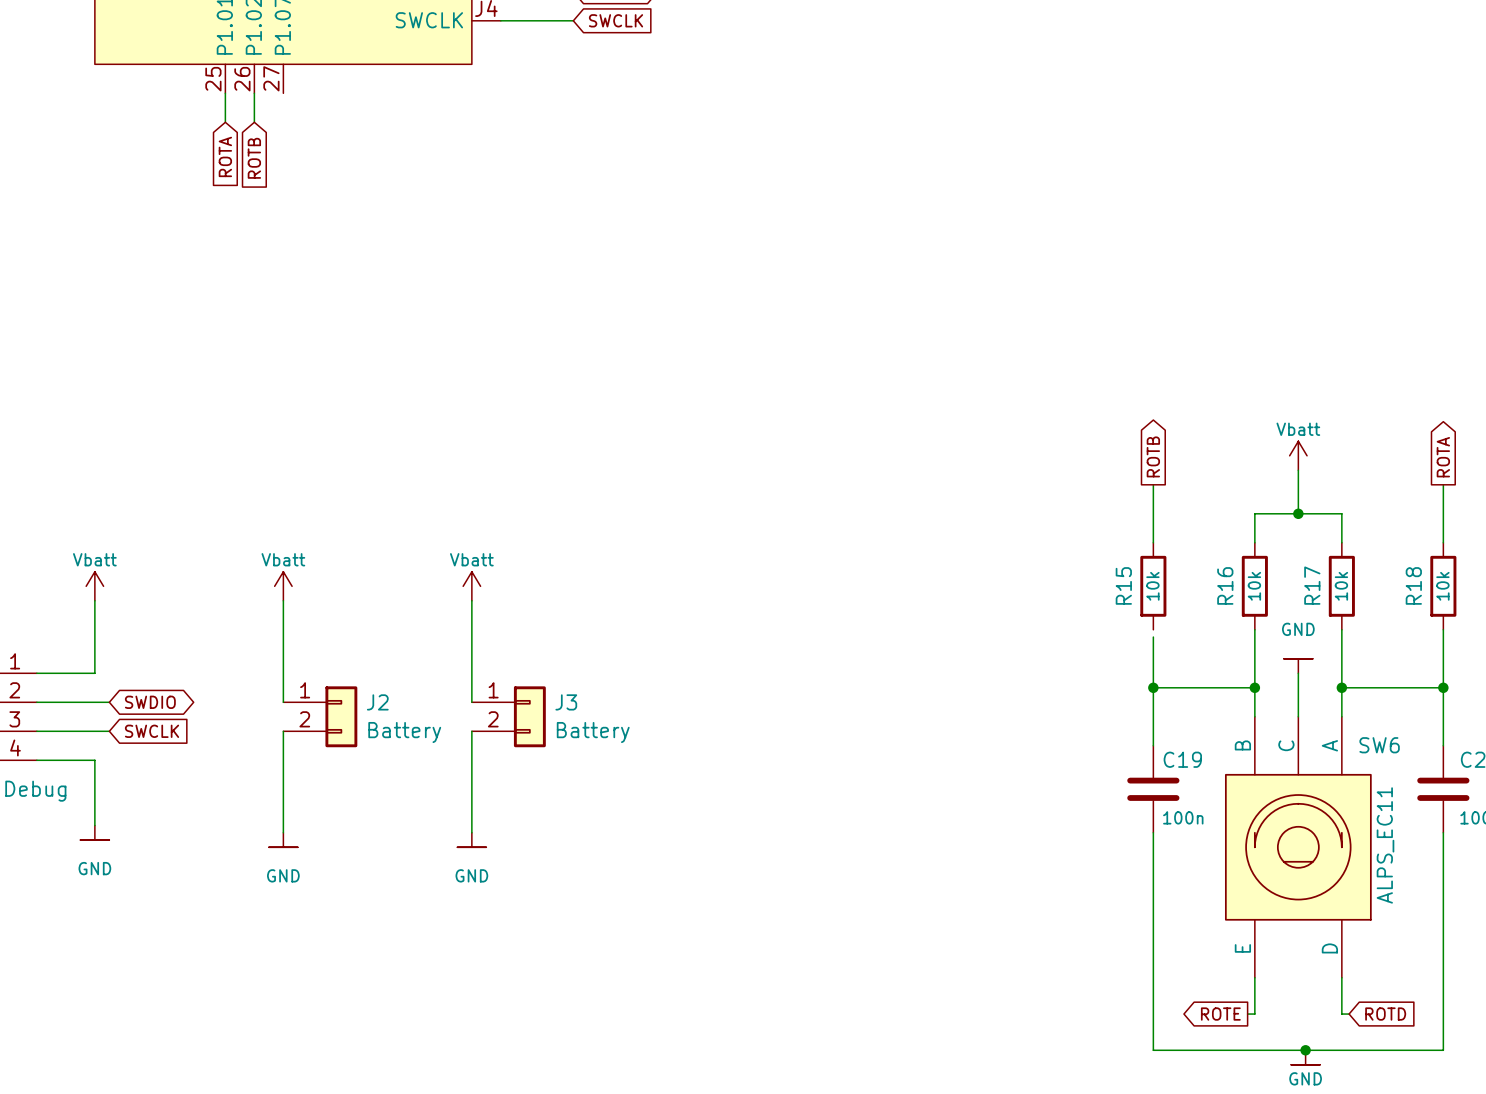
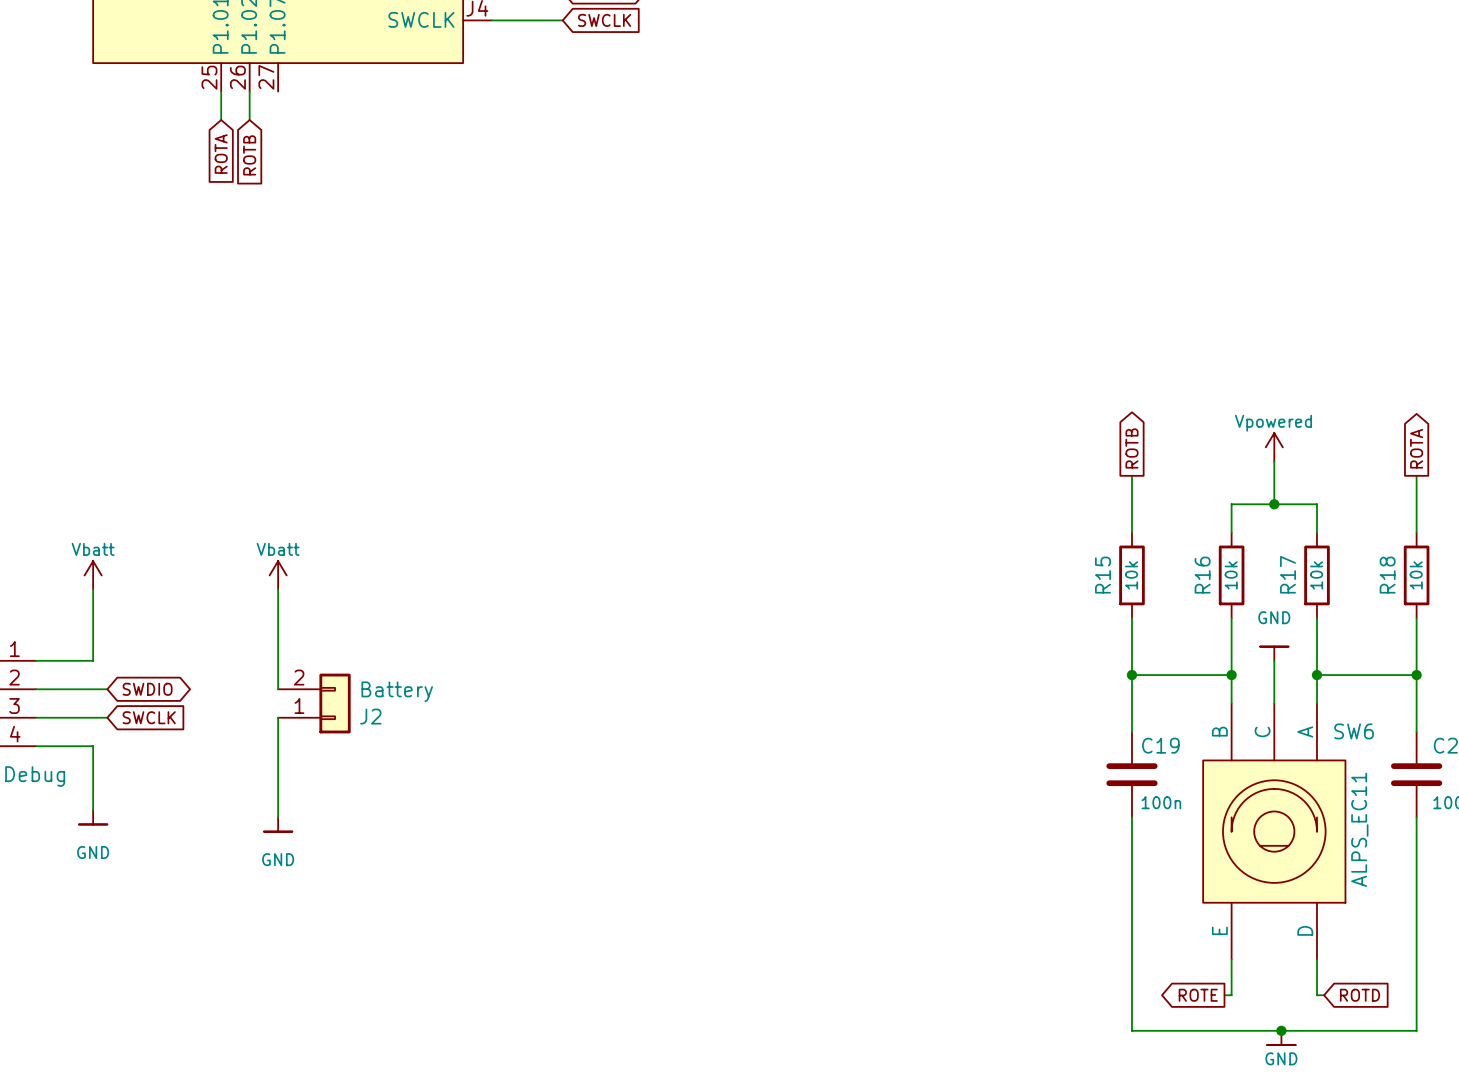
power symbol: Vbatt (1298, 455) -> Vpowered (1274, 447)
power symbol: Vbatt (471, 586) -> none
wire: (471, 600) (471, 702) -> none
wire: none -> (1131, 618) (1131, 625)
J2 flip: as is (341, 716) -> up-down (335, 703)
J3: Battery (508, 716) -> none
wire: (471, 731) (471, 832) -> none
power symbol: GND (471, 840) -> none

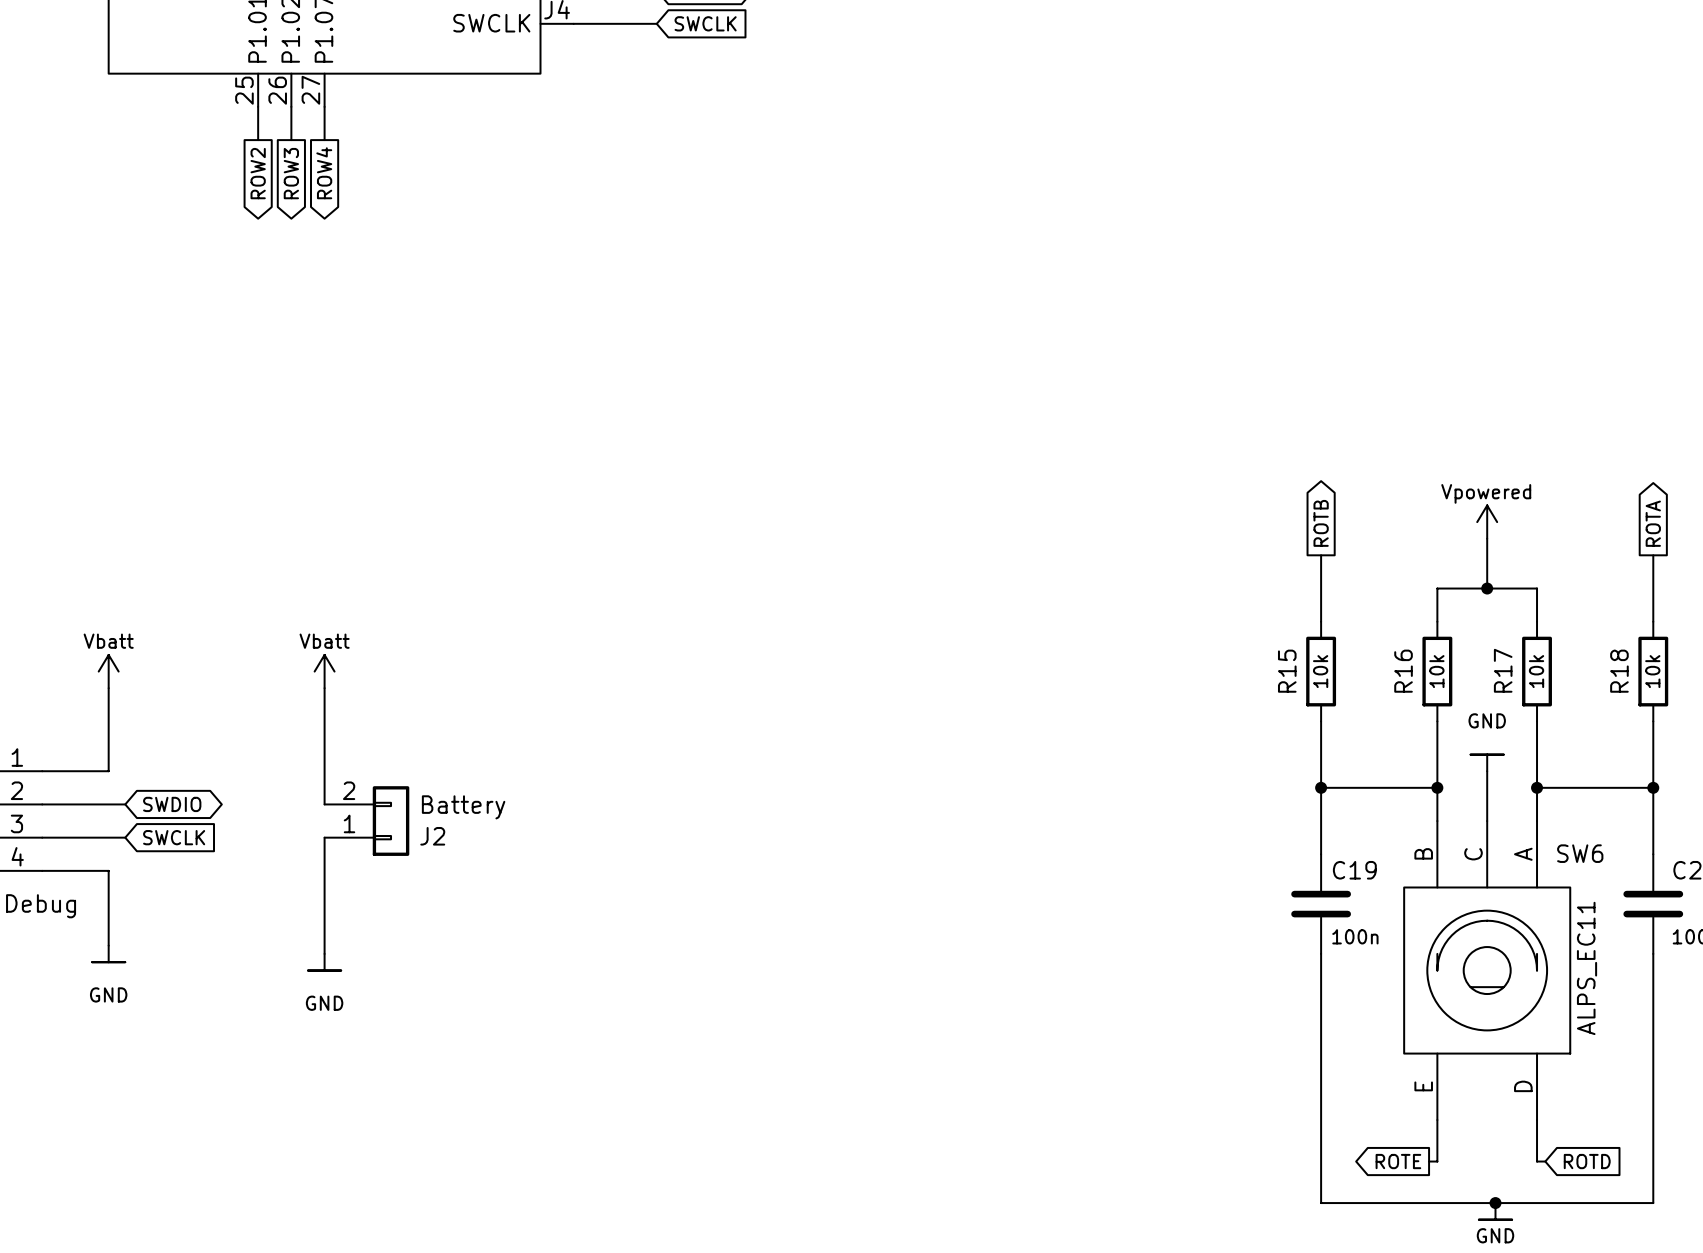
wire: none -> (324, 106) (324, 140)
global label: none -> ROW4 (324, 173)
global label shape: input (221, 154) -> output (258, 173)
global label: ROTA (221, 154) -> ROW2 (258, 173)
global label shape: input (249, 155) -> output (291, 173)
global label: ROTB (249, 155) -> ROW3 (291, 173)

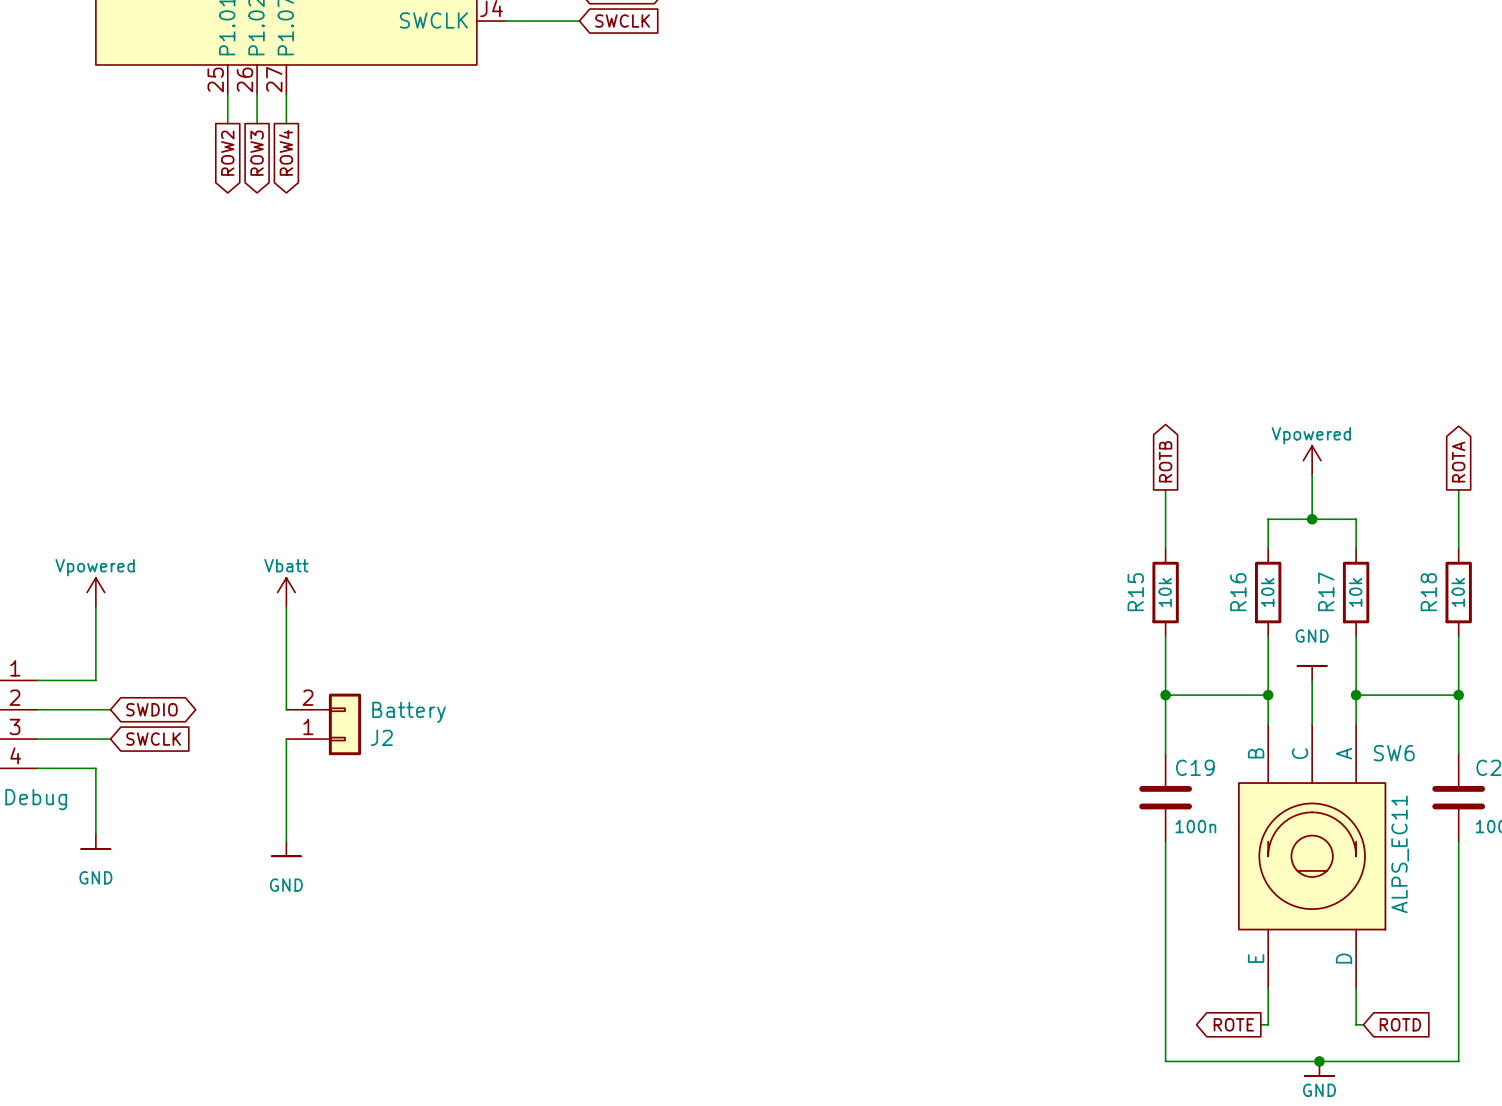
power symbol: Vbatt (108, 671) -> Vpowered (95, 592)

